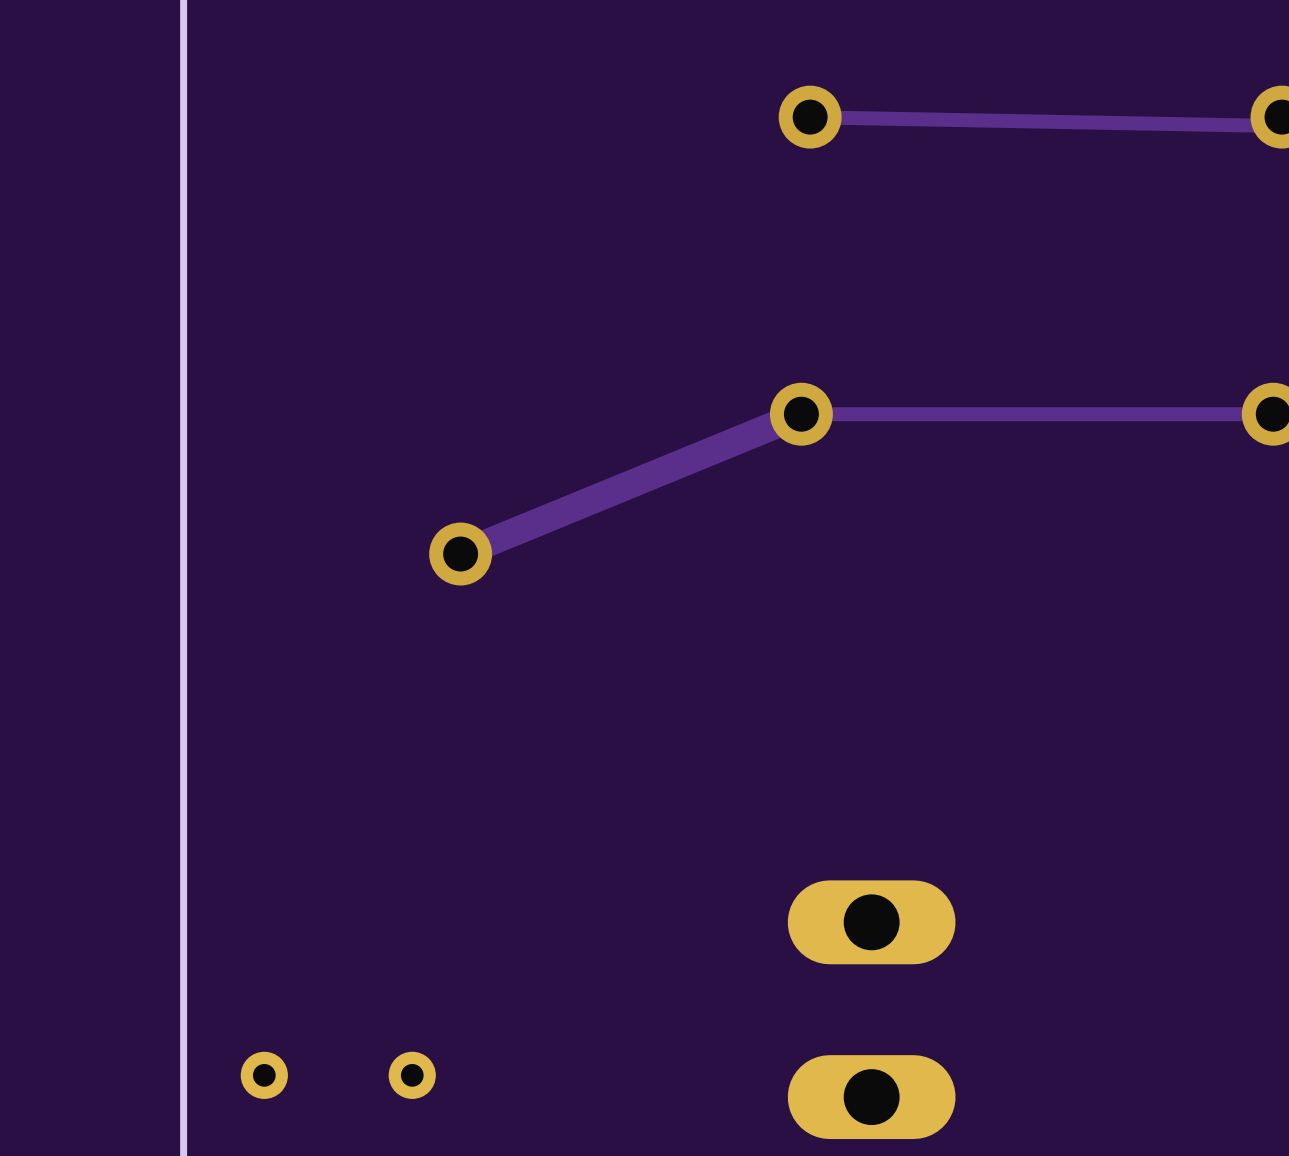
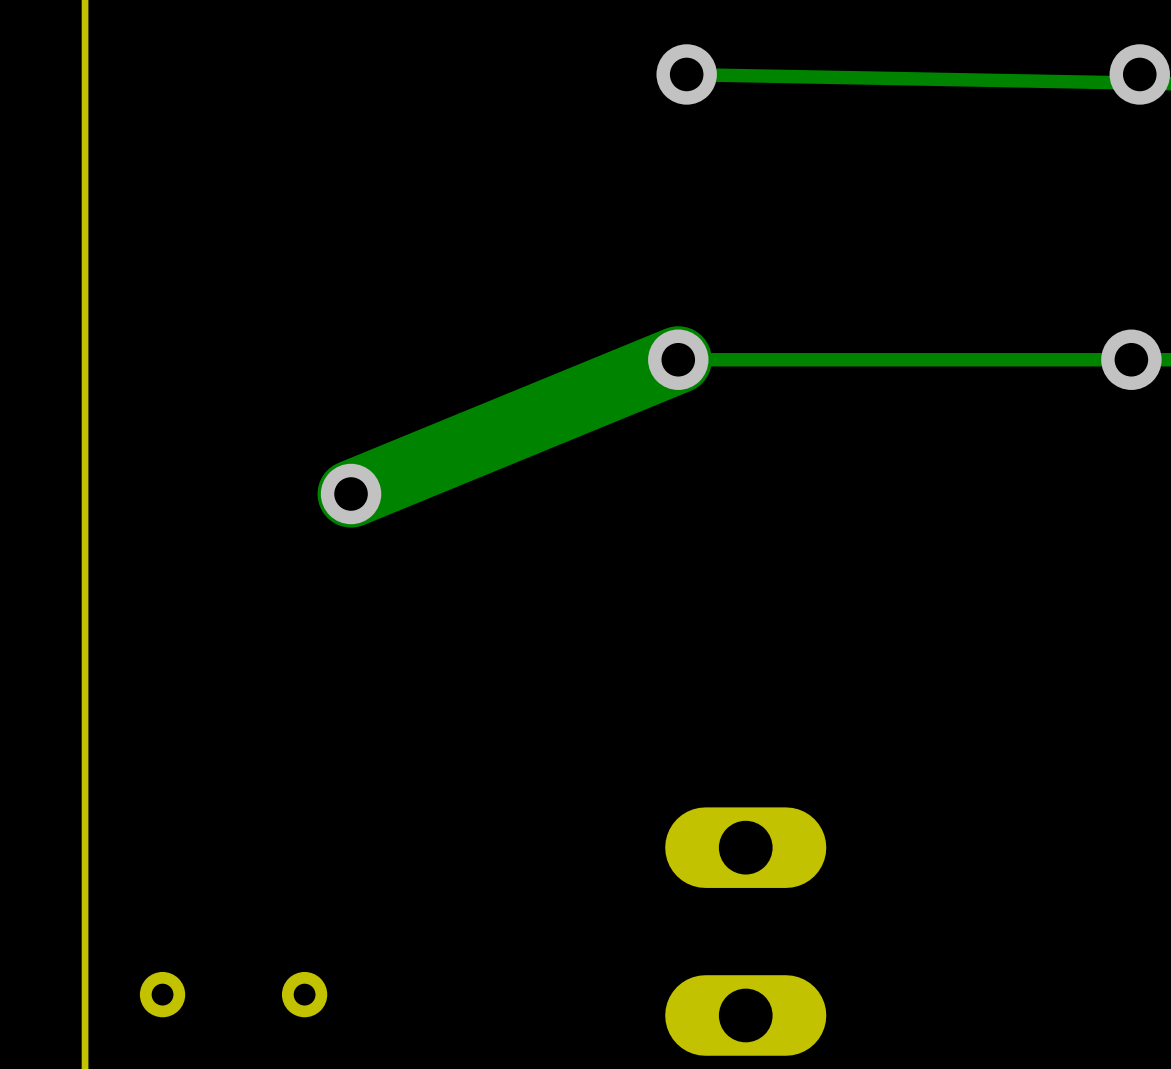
track width: thin (801, 414) (460, 554) -> thick (678, 359) (351, 494)

